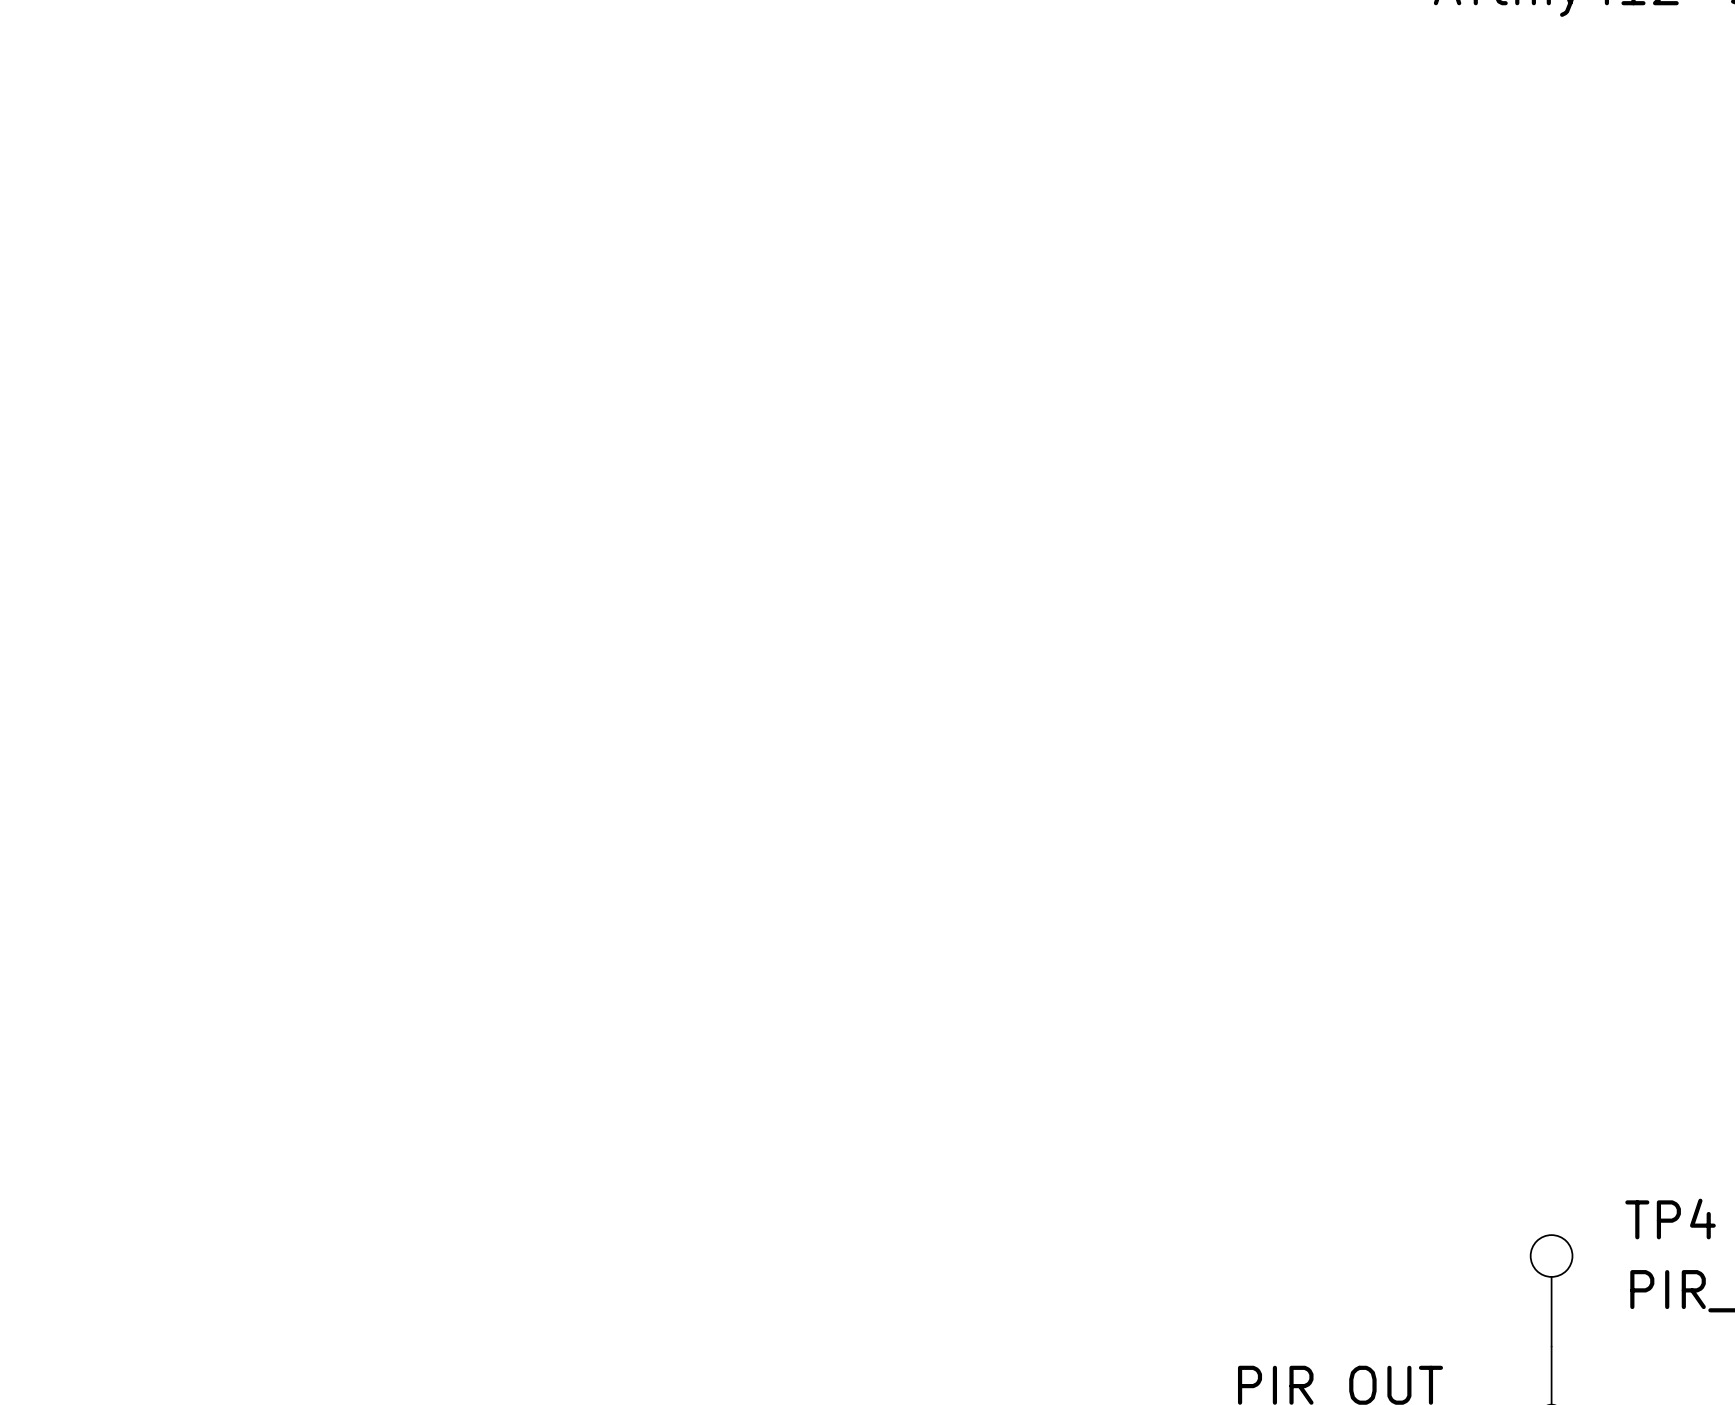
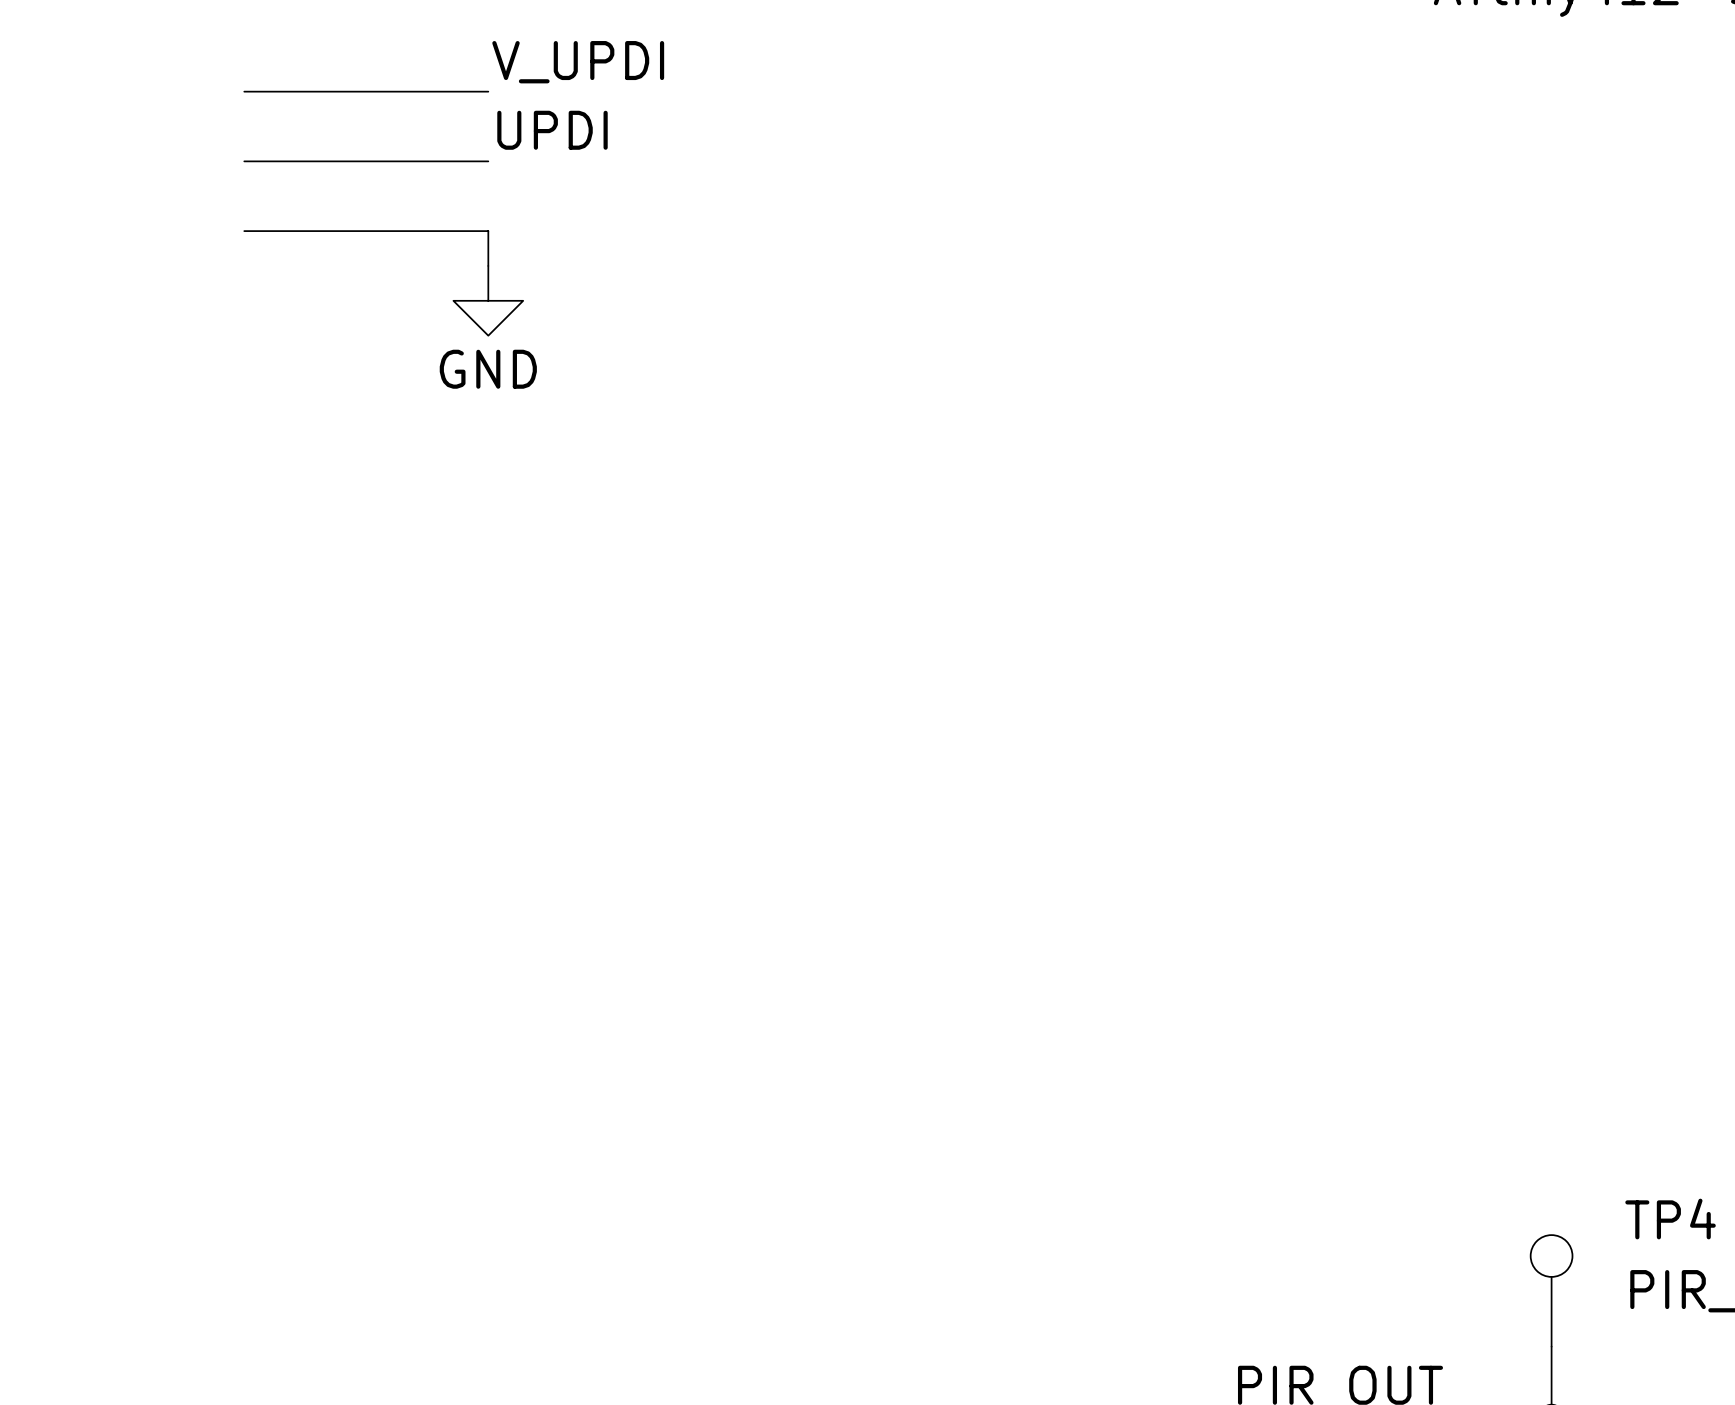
label: none -> V_UPDI (578, 62)
wire: none -> (244, 91) (488, 91)
label: none -> UPDI (552, 130)
wire: none -> (244, 161) (488, 161)
wire: none -> (244, 231) (488, 231) (488, 265)
power symbol: none -> GND (488, 300)

